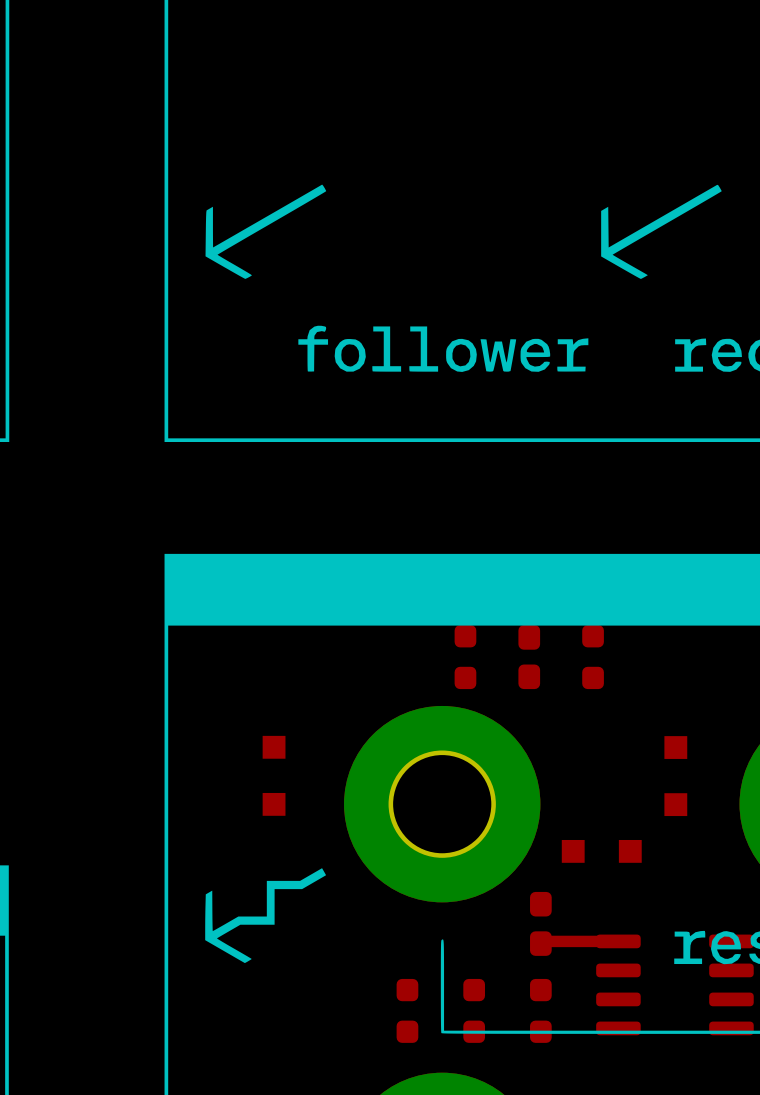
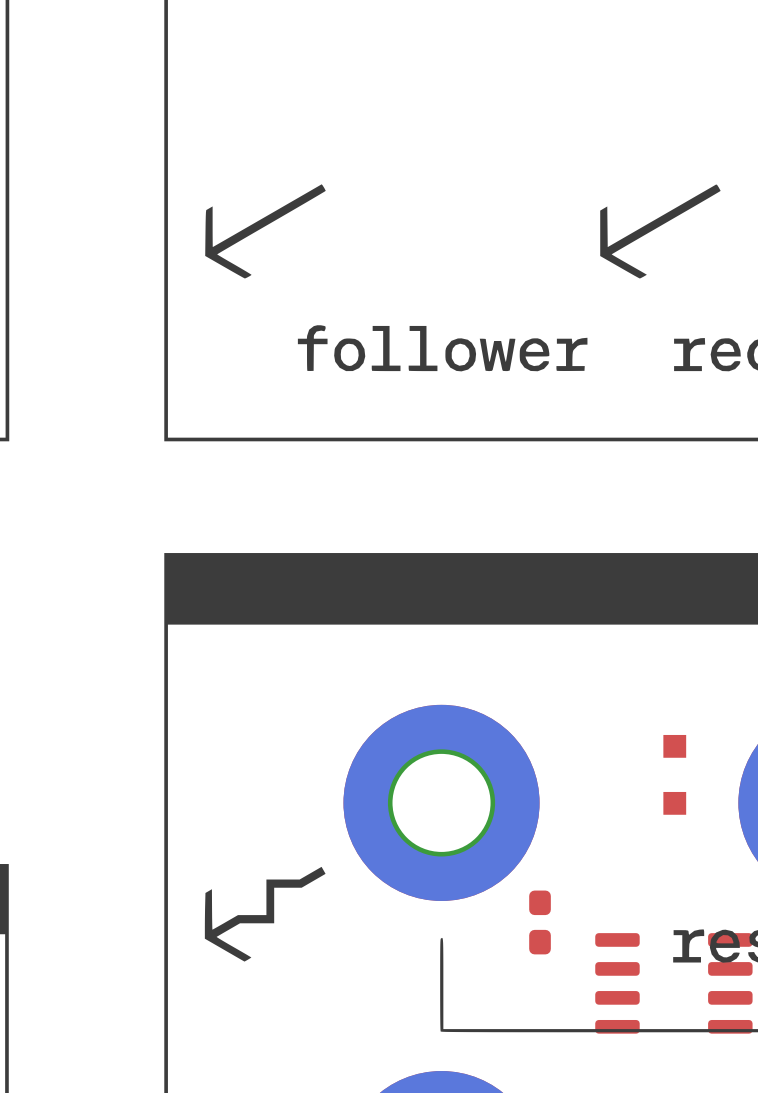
part: (465, 657) -> none
part: (529, 657) -> none
part: (593, 657) -> none
part: (274, 775) -> none
part: (601, 851) -> none
top track: (618, 941) (543, 941) (540, 943) -> none
part: (407, 1010) -> none
part: (474, 1010) -> none
part: (540, 1010) -> none

